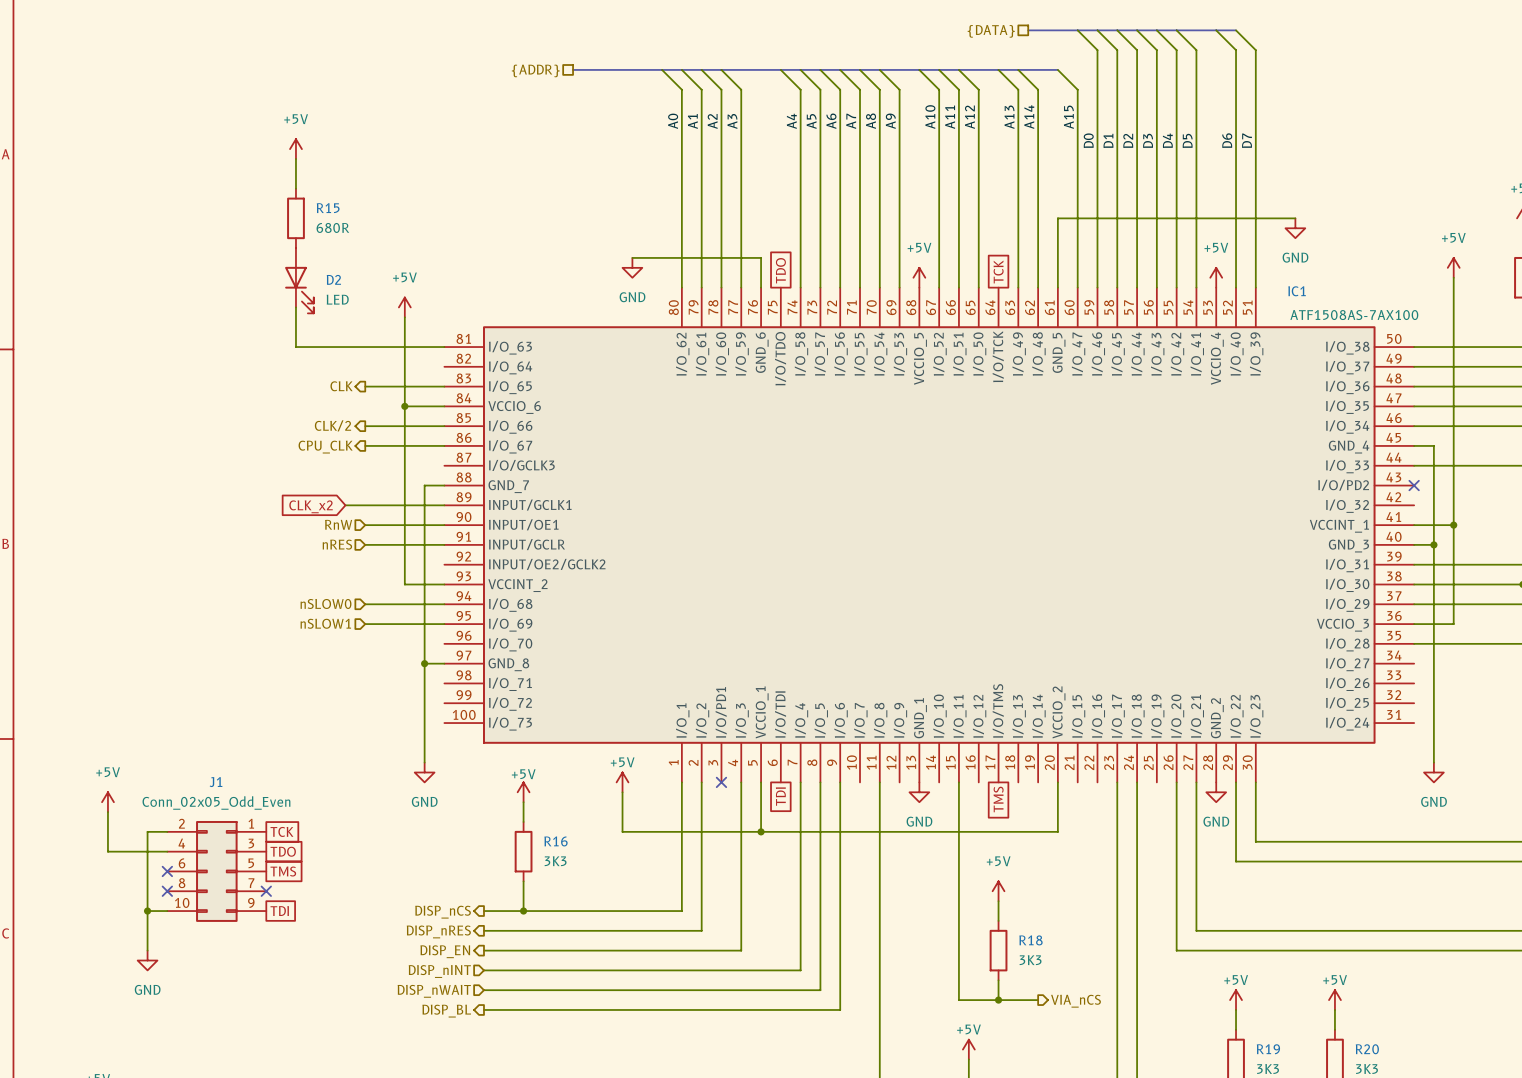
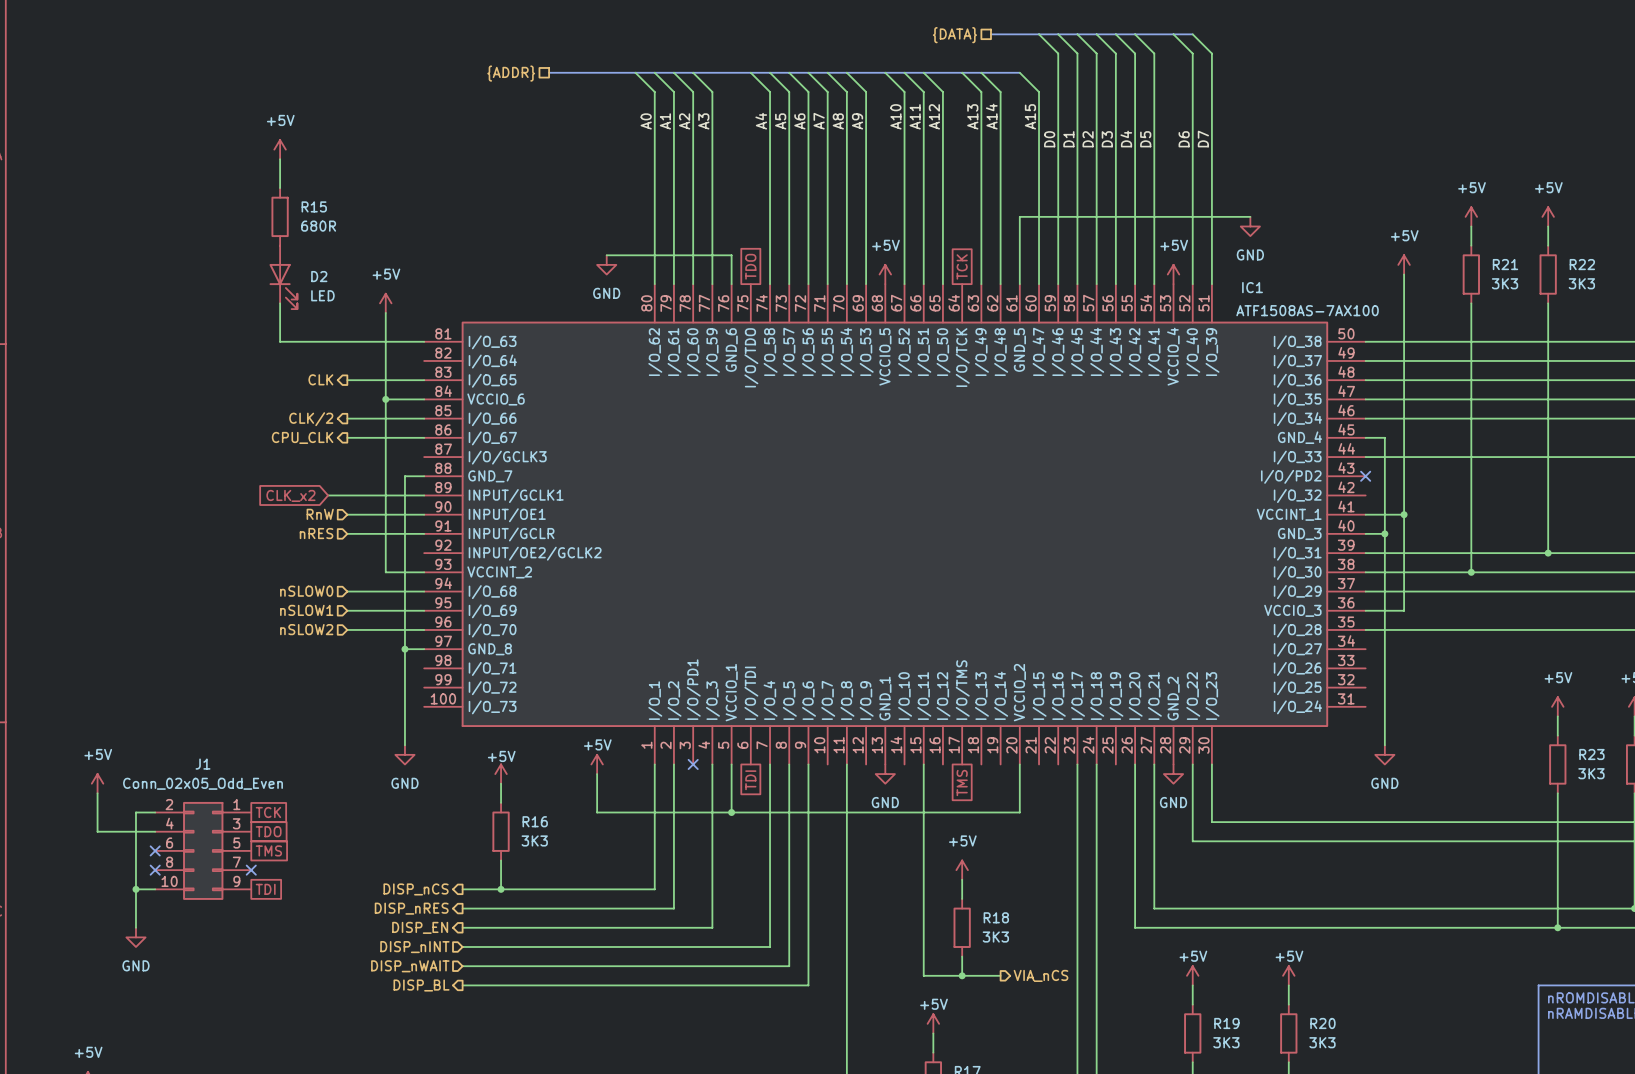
hierarchical label: none -> nSLOW2 (306, 629)
wire: none -> (347, 629) (424, 629)

